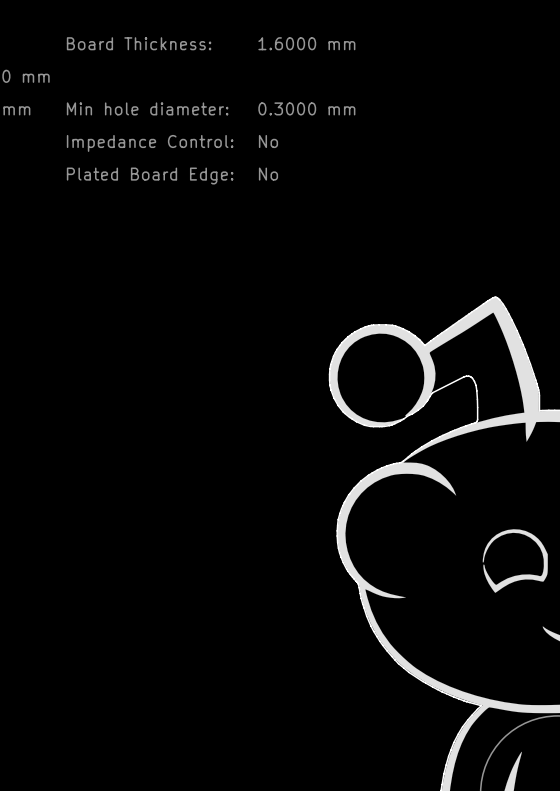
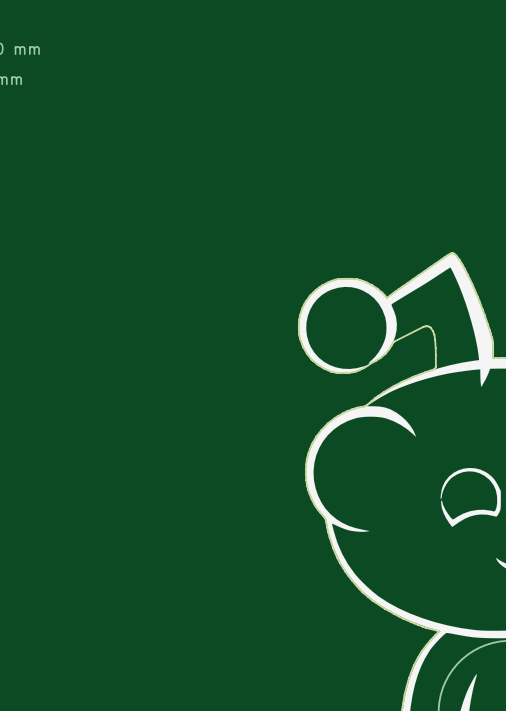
text: Board Thickness: (139, 43) -> none
text: 1.6000 mm (306, 43) -> none
text: Min hole diameter: (147, 108) -> none
text: 0.3000 mm (306, 108) -> none
text: No (268, 141) -> none
text: Impedance Control: (150, 143) -> none
text: No (268, 174) -> none
text: Plated Board Edge: (150, 176) -> none

